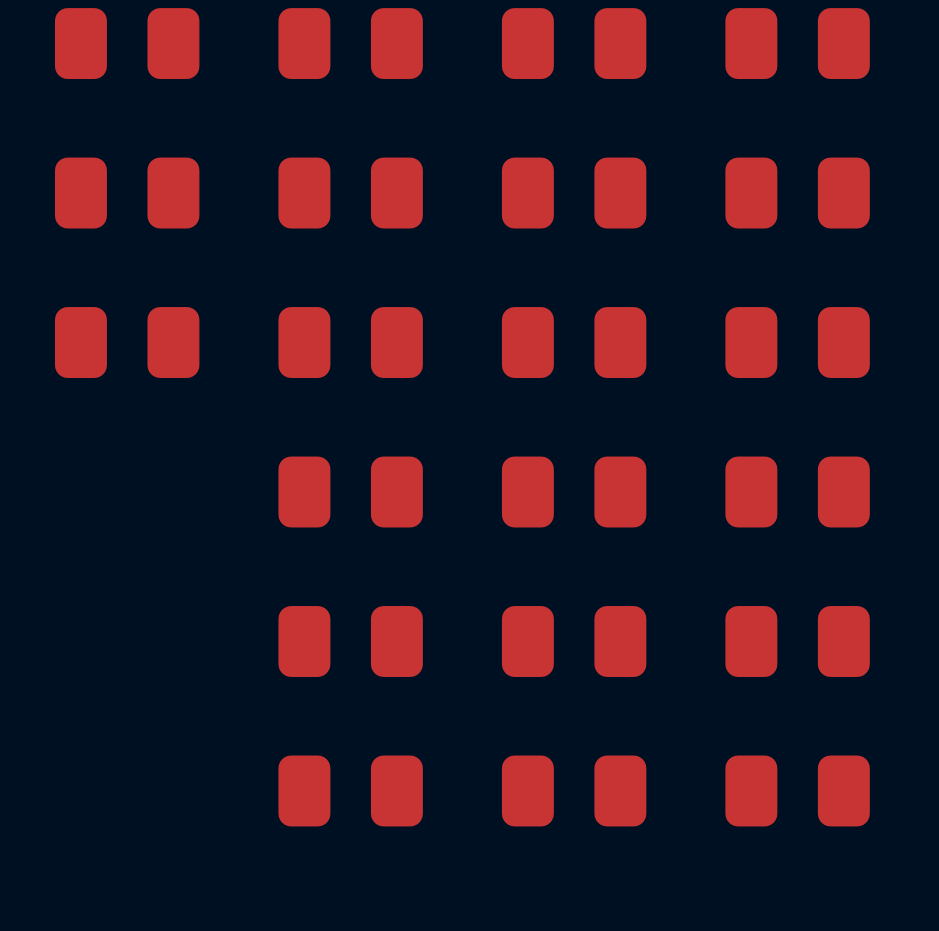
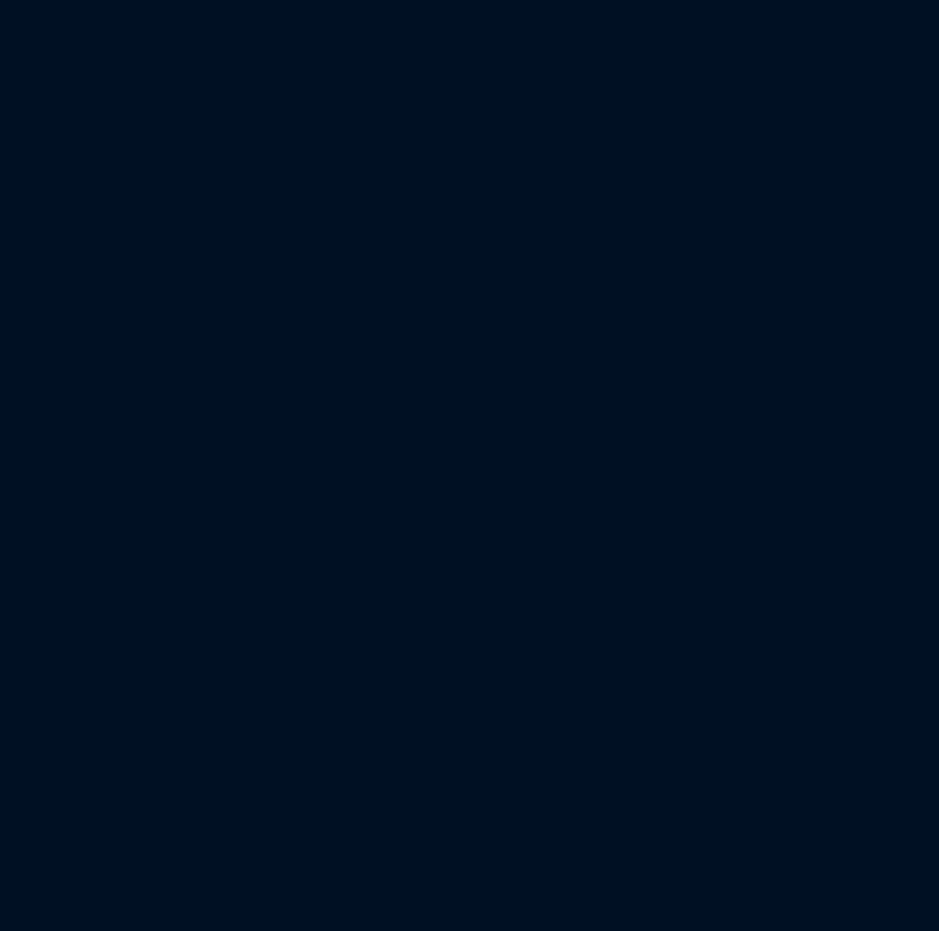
part: (127, 43) -> none
part: (350, 43) -> none
part: (574, 43) -> none
part: (797, 43) -> none
part: (127, 193) -> none
part: (350, 193) -> none
part: (574, 193) -> none
part: (797, 193) -> none
part: (127, 342) -> none
part: (350, 342) -> none
part: (574, 342) -> none
part: (797, 342) -> none
part: (350, 492) -> none
part: (574, 492) -> none
part: (797, 492) -> none
part: (350, 641) -> none
part: (574, 641) -> none
part: (797, 641) -> none
part: (350, 790) -> none
part: (574, 790) -> none
part: (797, 790) -> none

